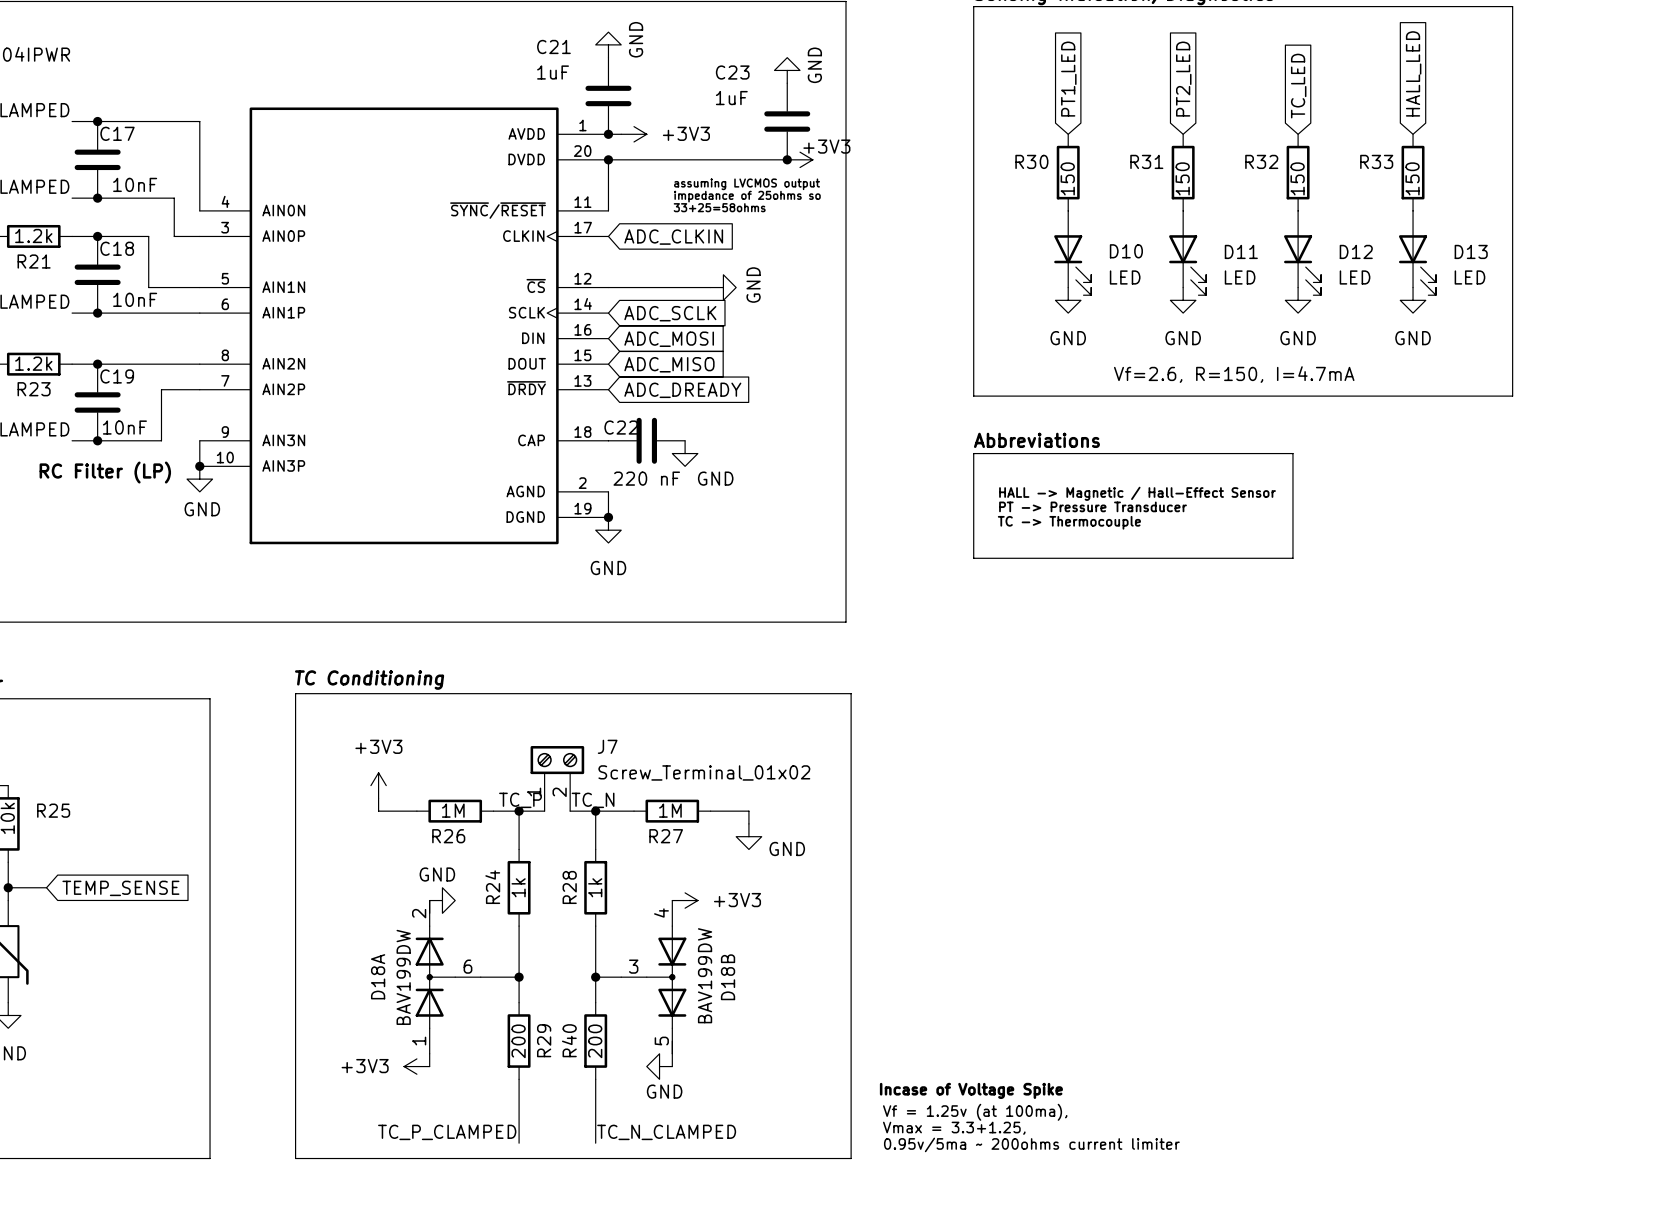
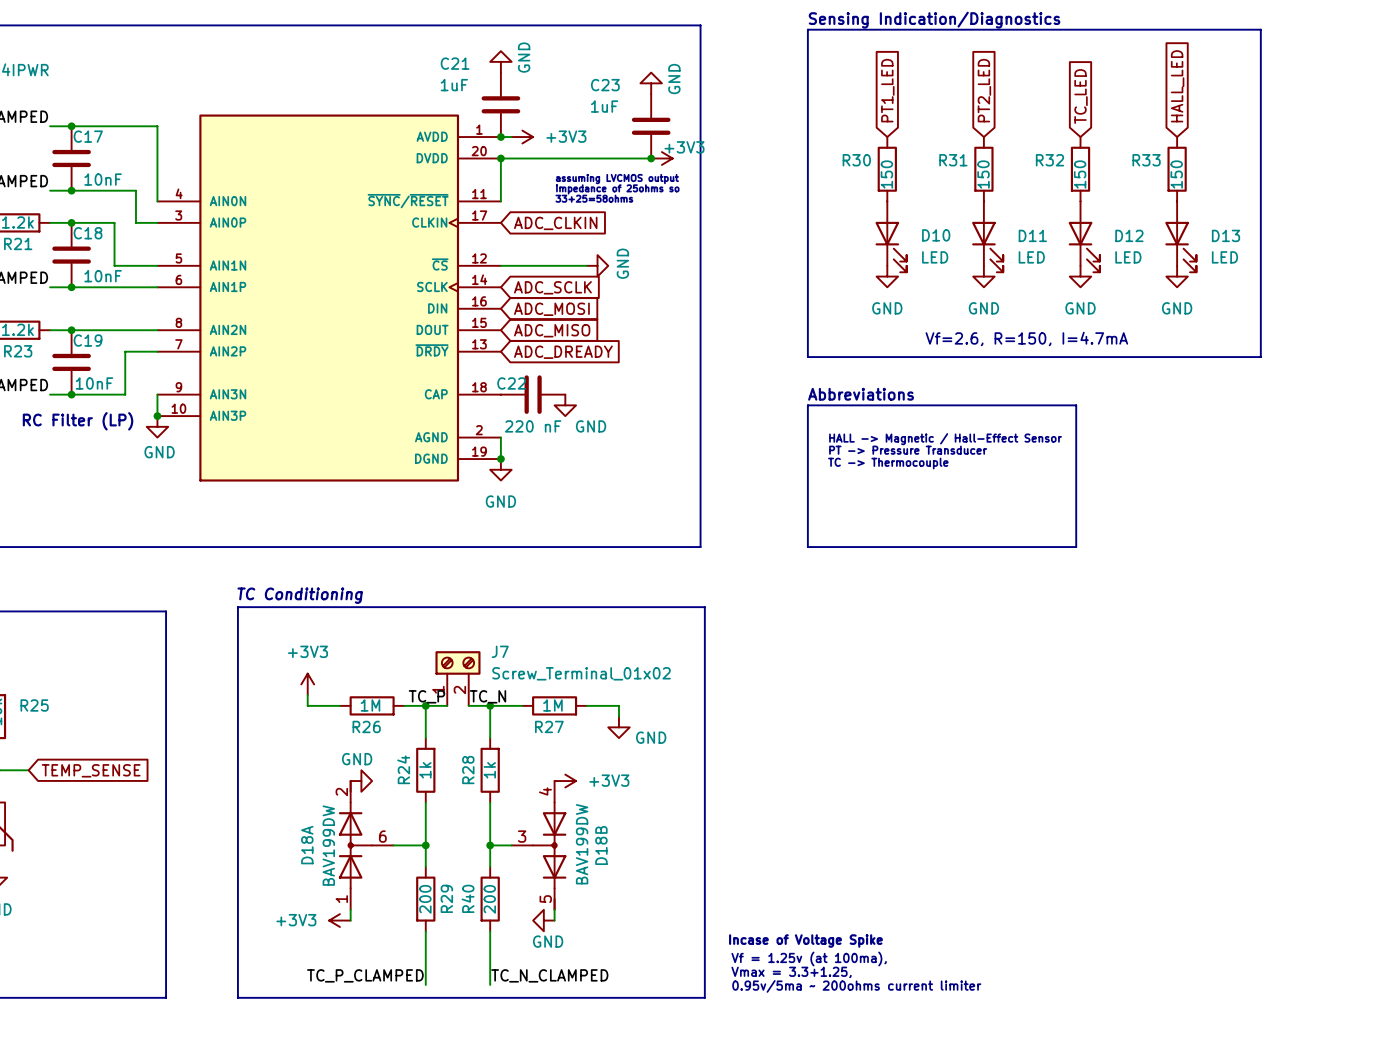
line: (973, 558) (1292, 558) -> (807, 493) (807, 547) (1076, 547) (1076, 493)

